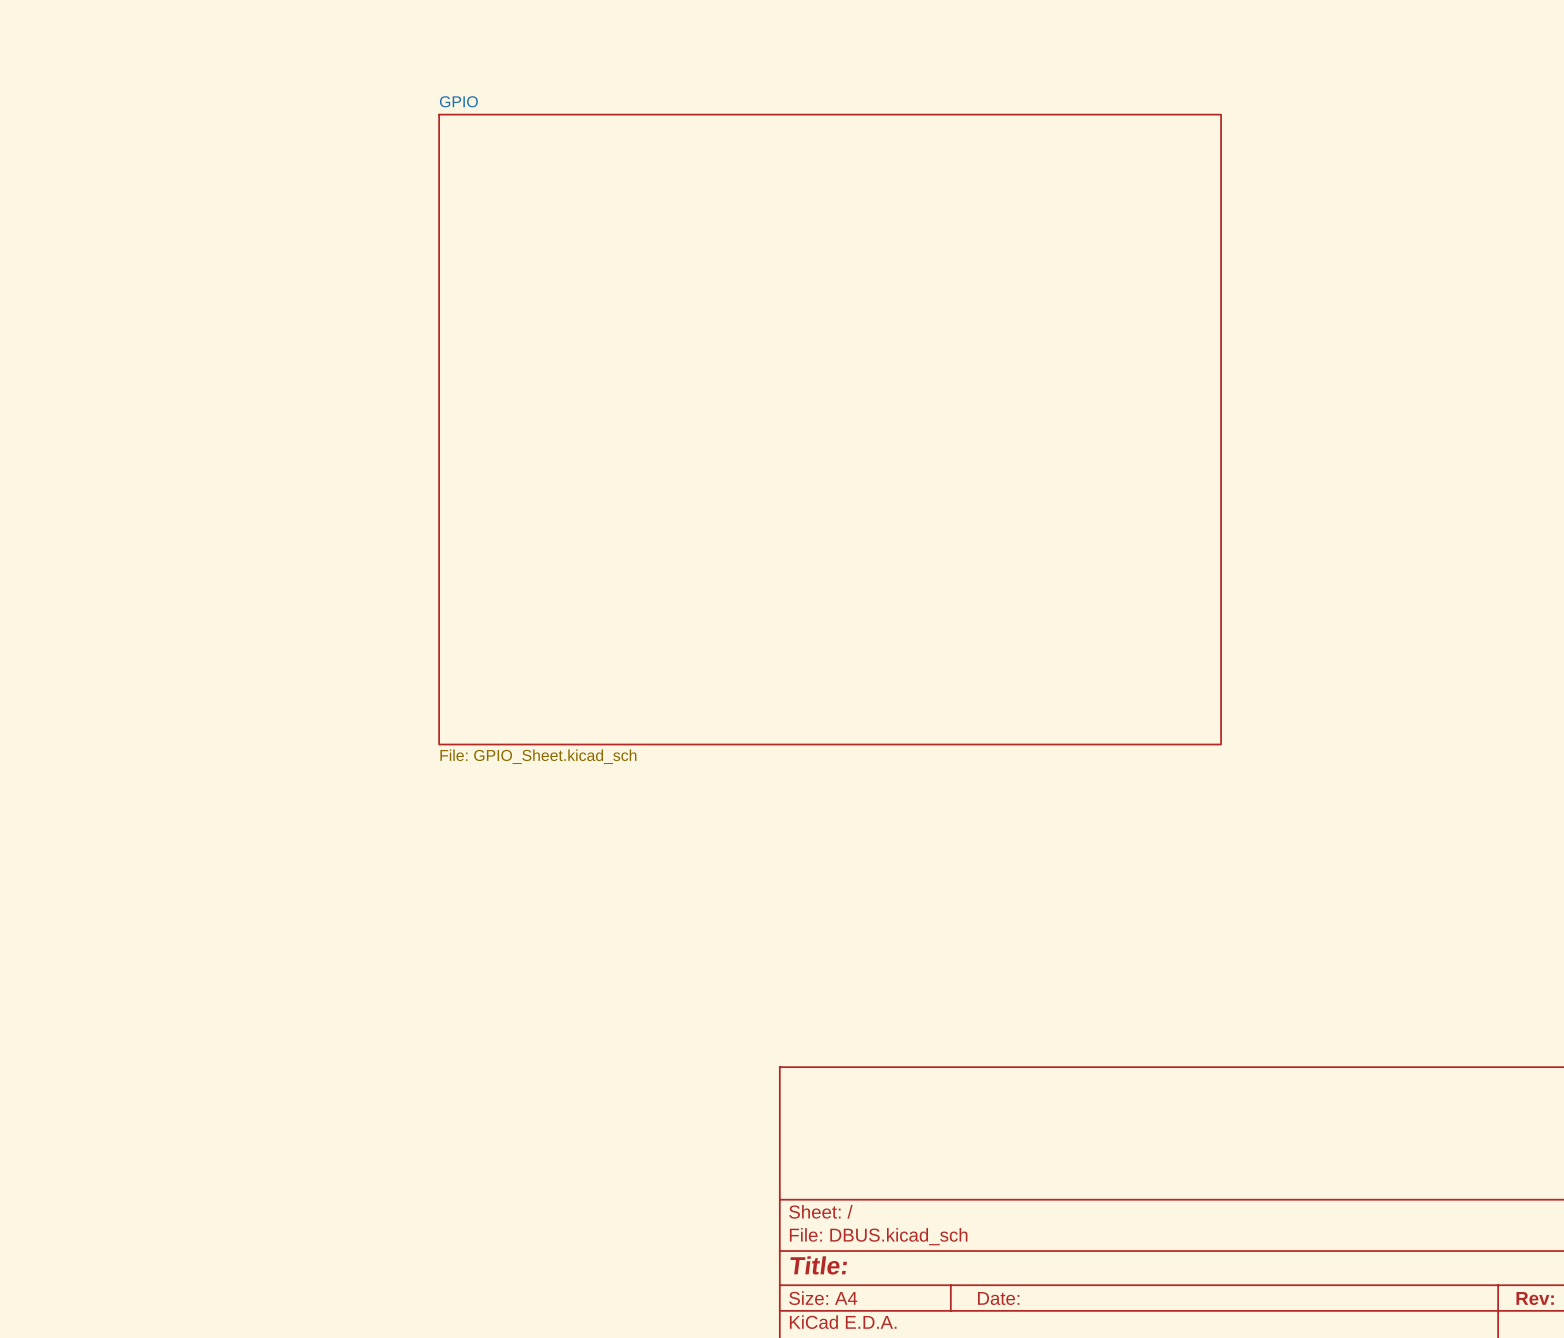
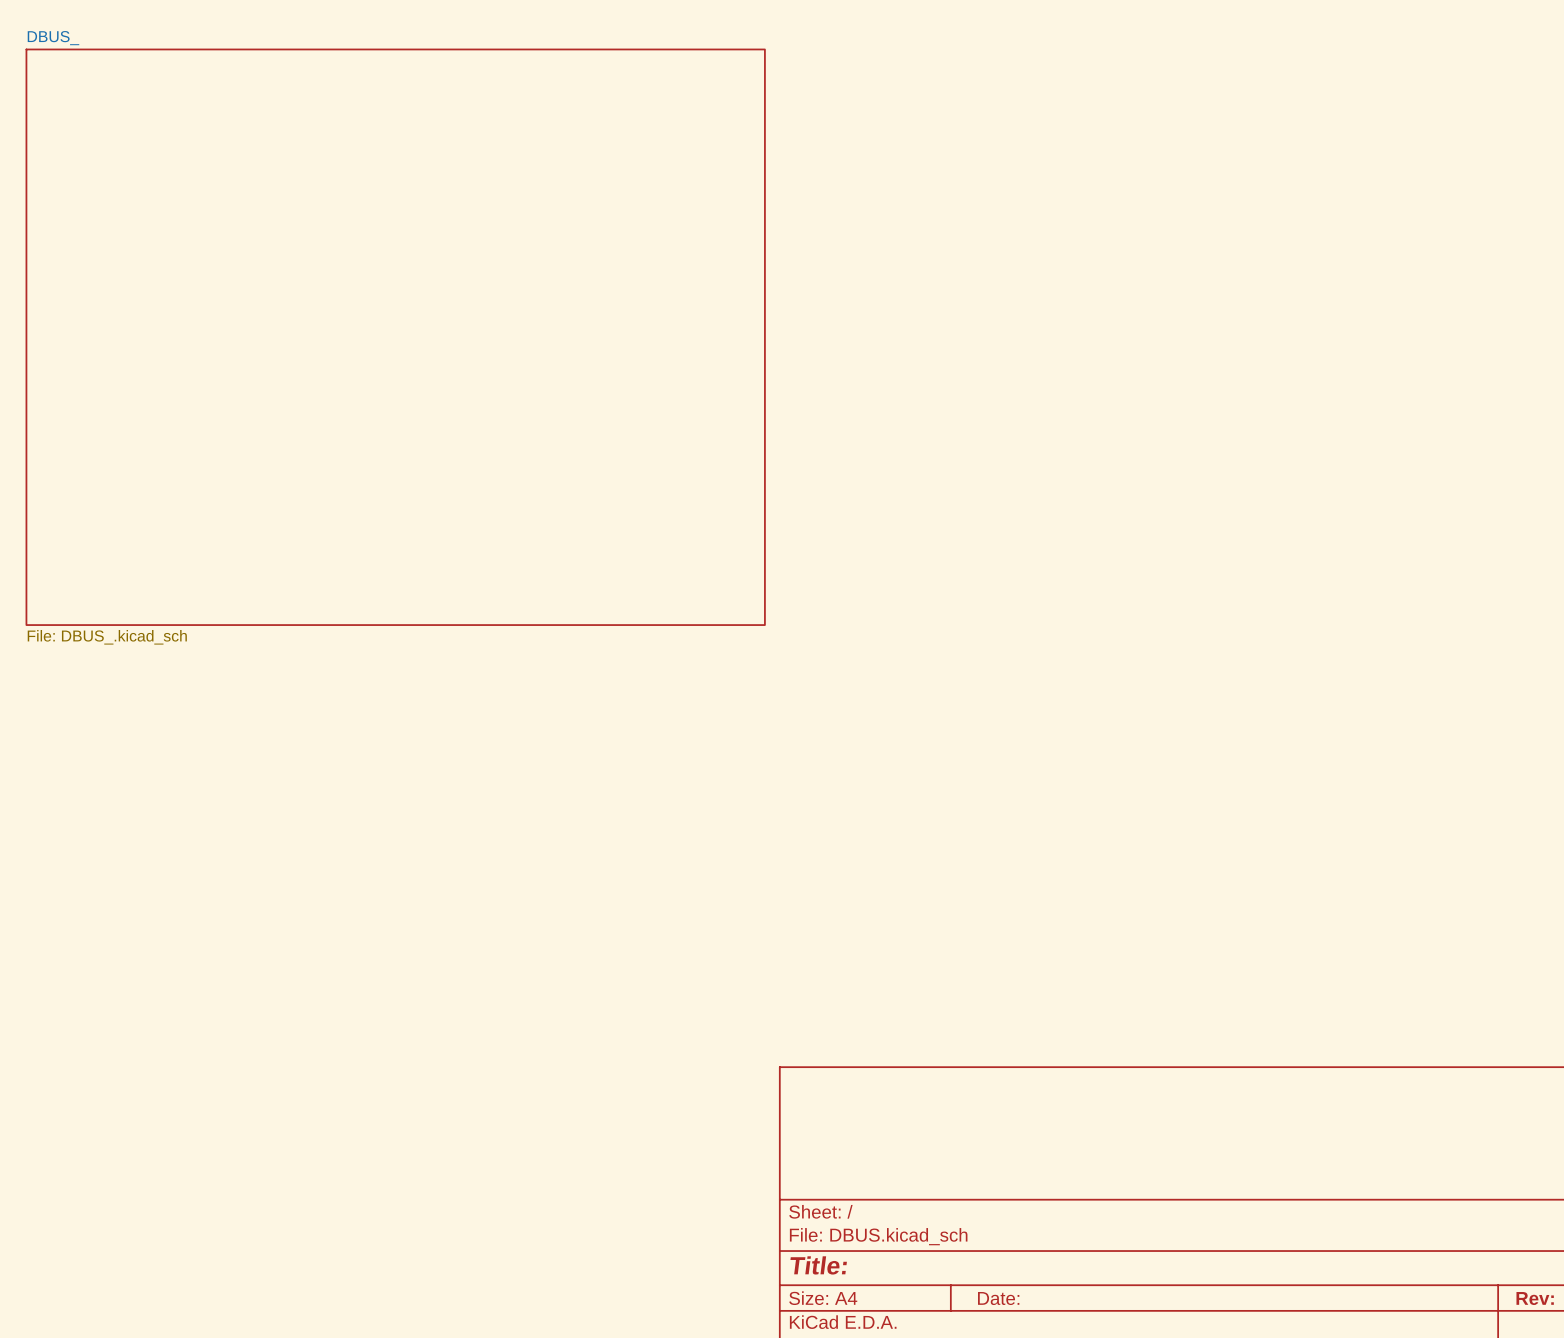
sheet DBUS_: none -> File: DBUS_.kicad_sch (395, 337)
sheet GPIO: File: GPIO_Sheet.kicad_sch (830, 429) -> none

